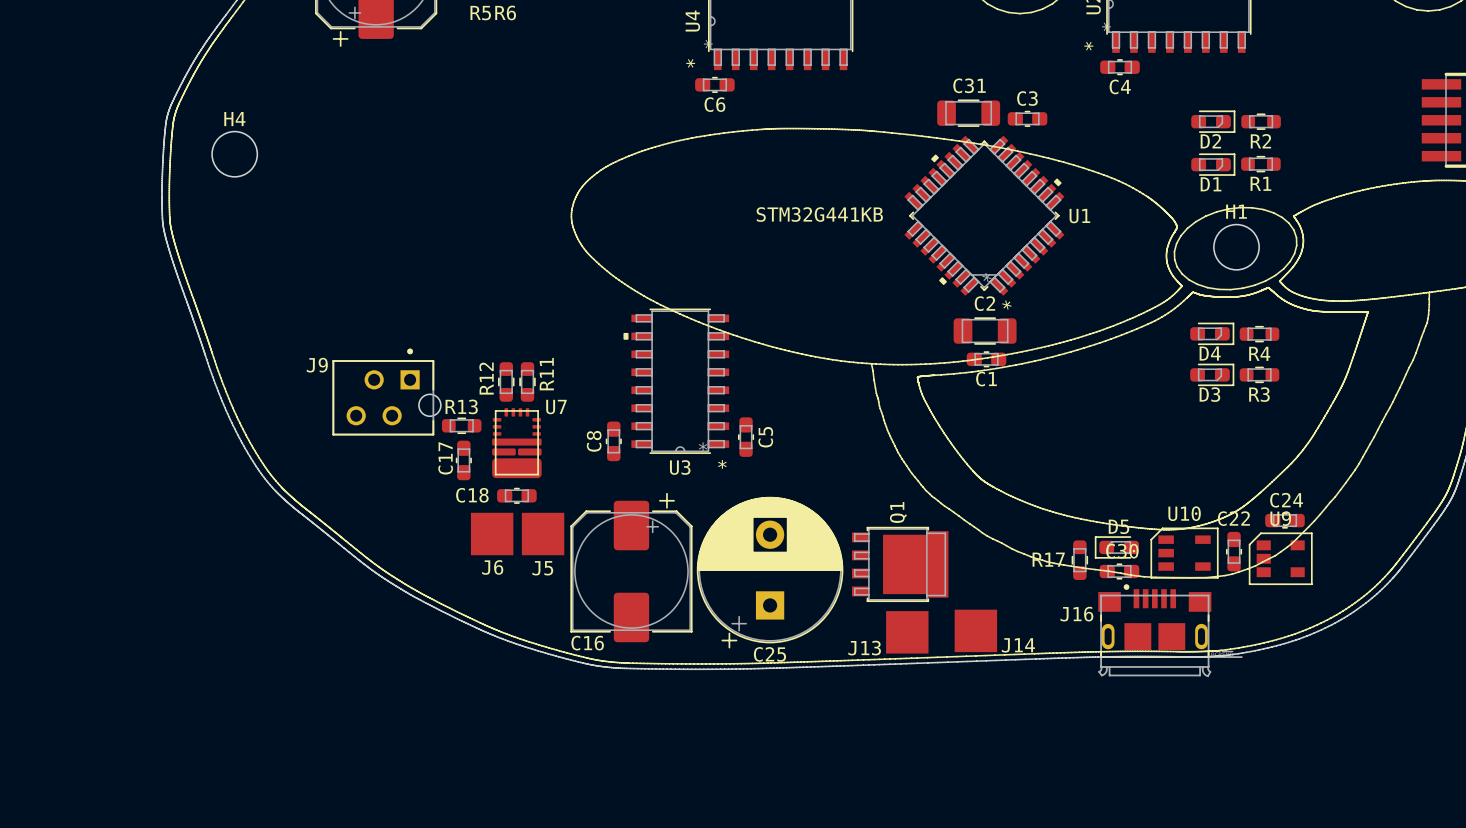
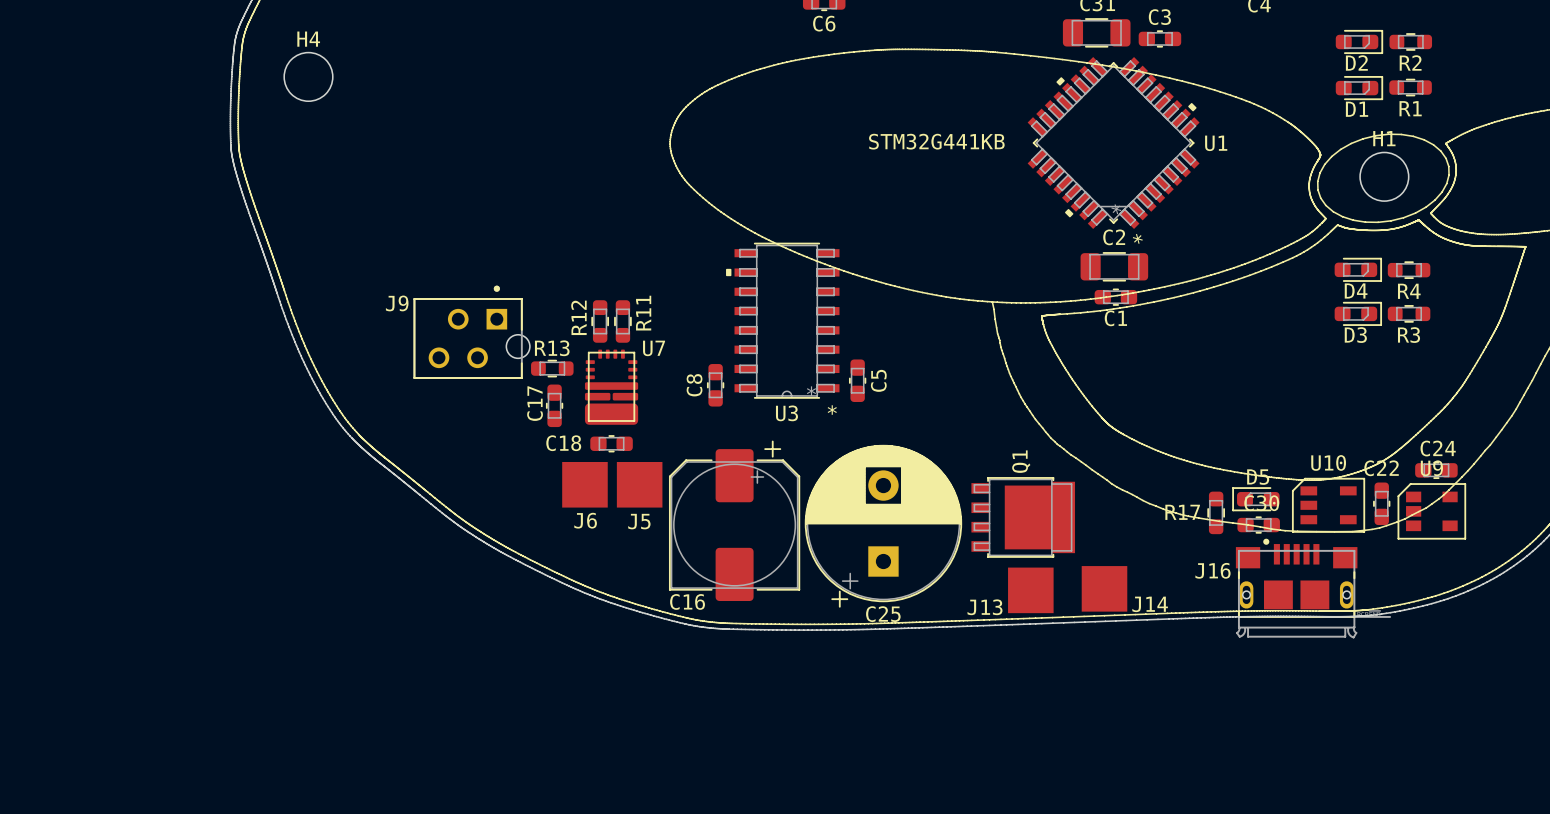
J16 footprint: [1098, 584, 1243, 678] -> [1235, 538, 1392, 639]

